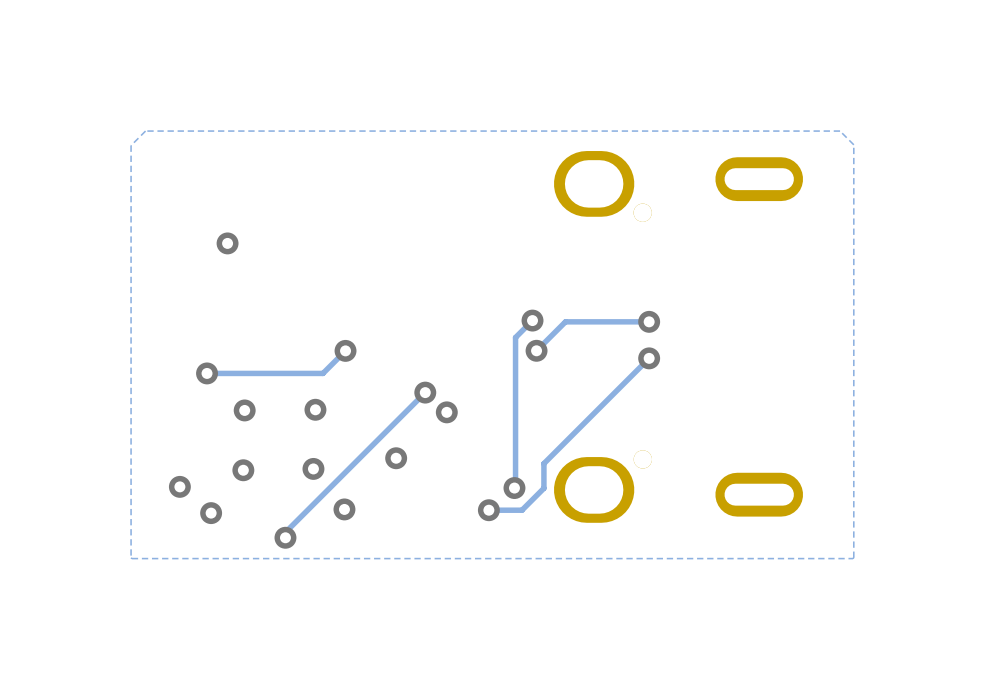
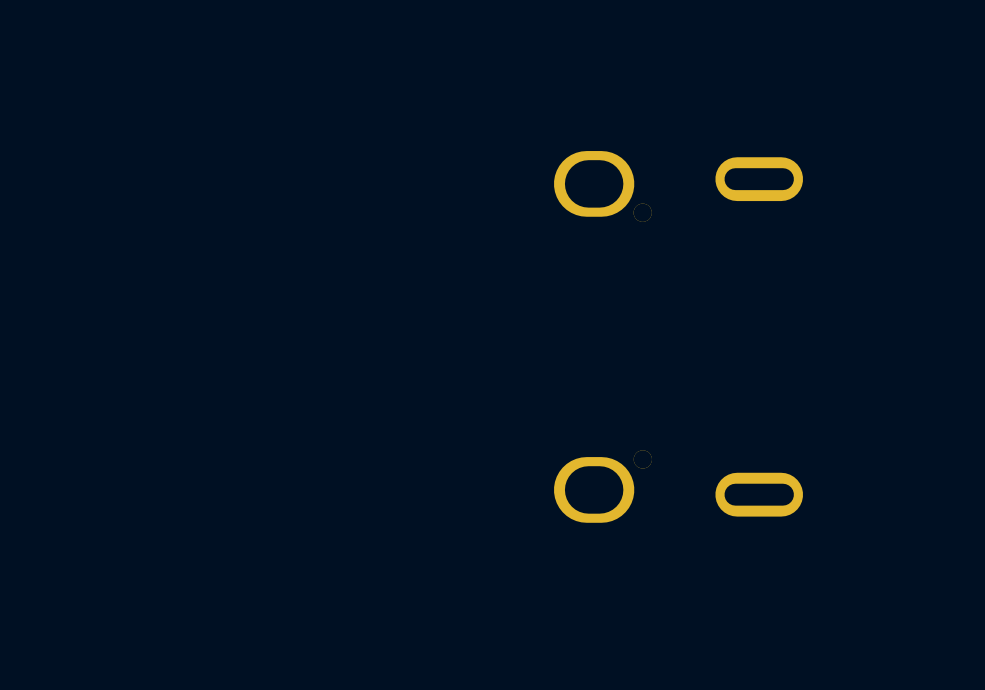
zone outline: (840, 131) (145, 131) (131, 145) (131, 557) (853, 558) (853, 144) (840, 131) -> none
via: (227, 243) -> none
track: (532, 320) (515, 337) (514, 488) -> none
via: (532, 320) -> none
track: (649, 321) (565, 321) (536, 350) -> none
via: (649, 321) -> none
track: (345, 350) (322, 373) (207, 373) -> none
via: (345, 350) -> none
via: (536, 350) -> none
track: (649, 358) (543, 463) (543, 488) (522, 510) (488, 510) -> none
via: (649, 358) -> none
via: (207, 373) -> none
track: (425, 392) (285, 532) (285, 537) -> none
via: (425, 392) -> none
via: (315, 409) -> none
via: (244, 410) -> none
via: (446, 412) -> none
via: (396, 458) -> none
via: (313, 468) -> none
via: (243, 470) -> none
via: (179, 486) -> none
via: (514, 488) -> none
via: (344, 509) -> none
via: (488, 510) -> none
via: (211, 513) -> none
via: (285, 537) -> none

